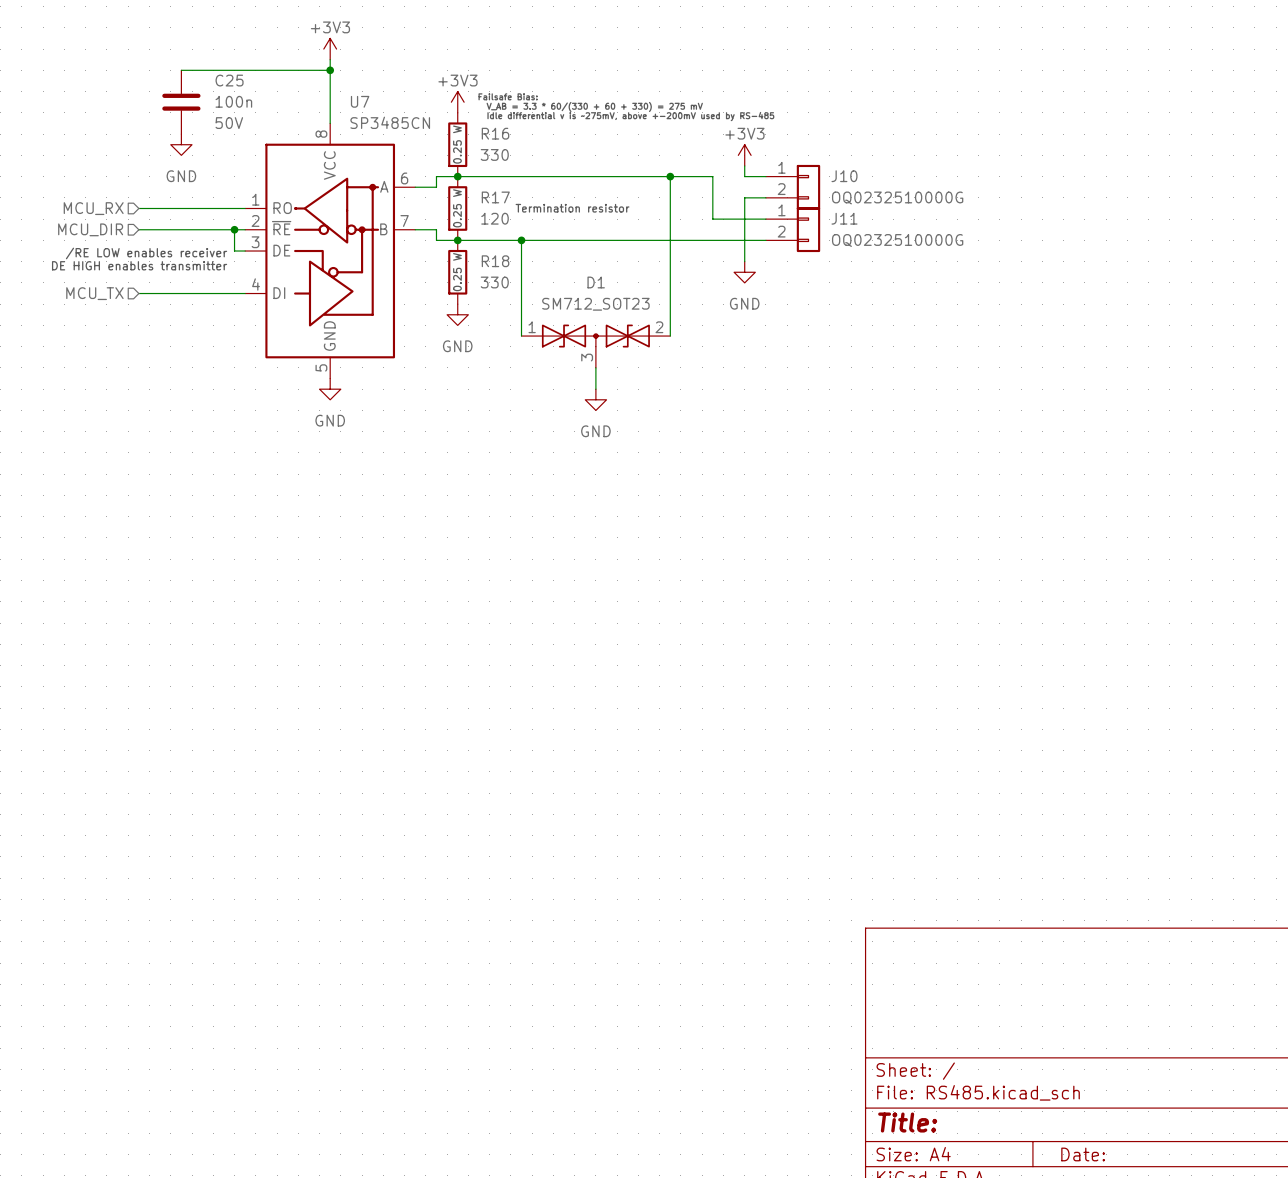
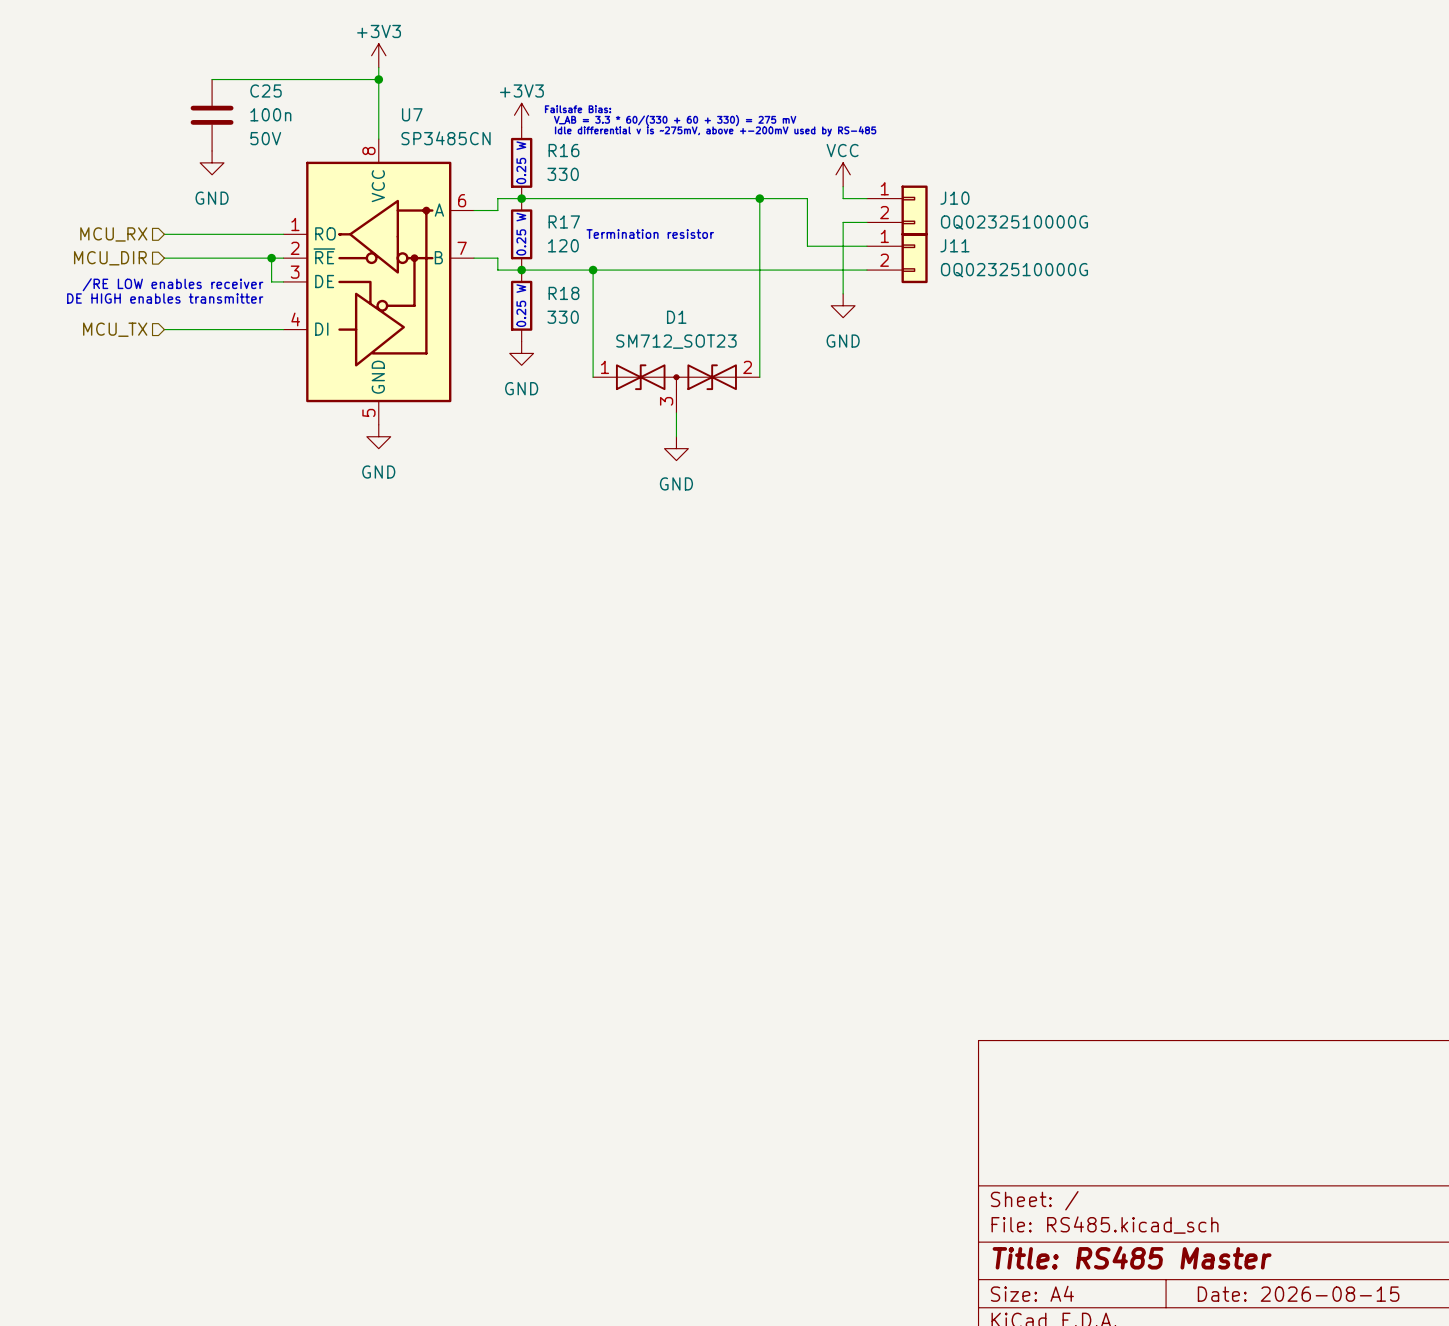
power symbol: +3V3 (744, 155) -> VCC (843, 174)
title block: Title: (907, 1122) -> Title: RS485 Master (1132, 1257)
title block: Date: (1083, 1154) -> Date: 2026-08-15 (1298, 1294)

